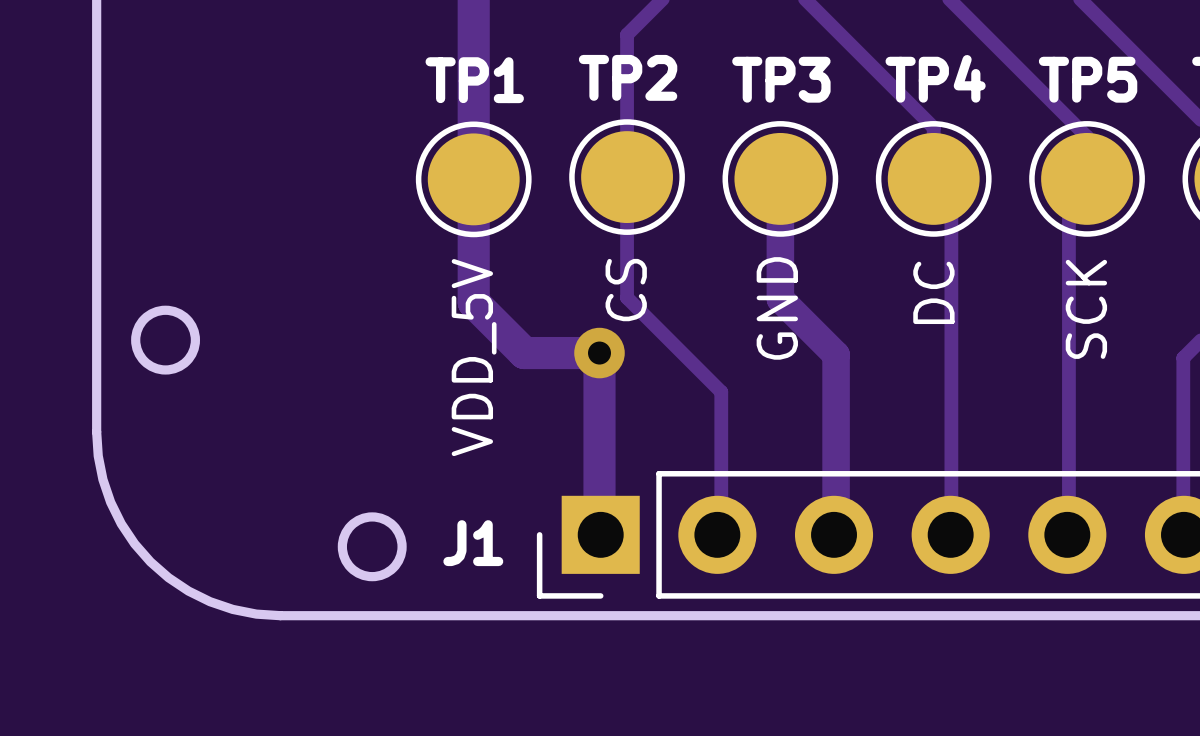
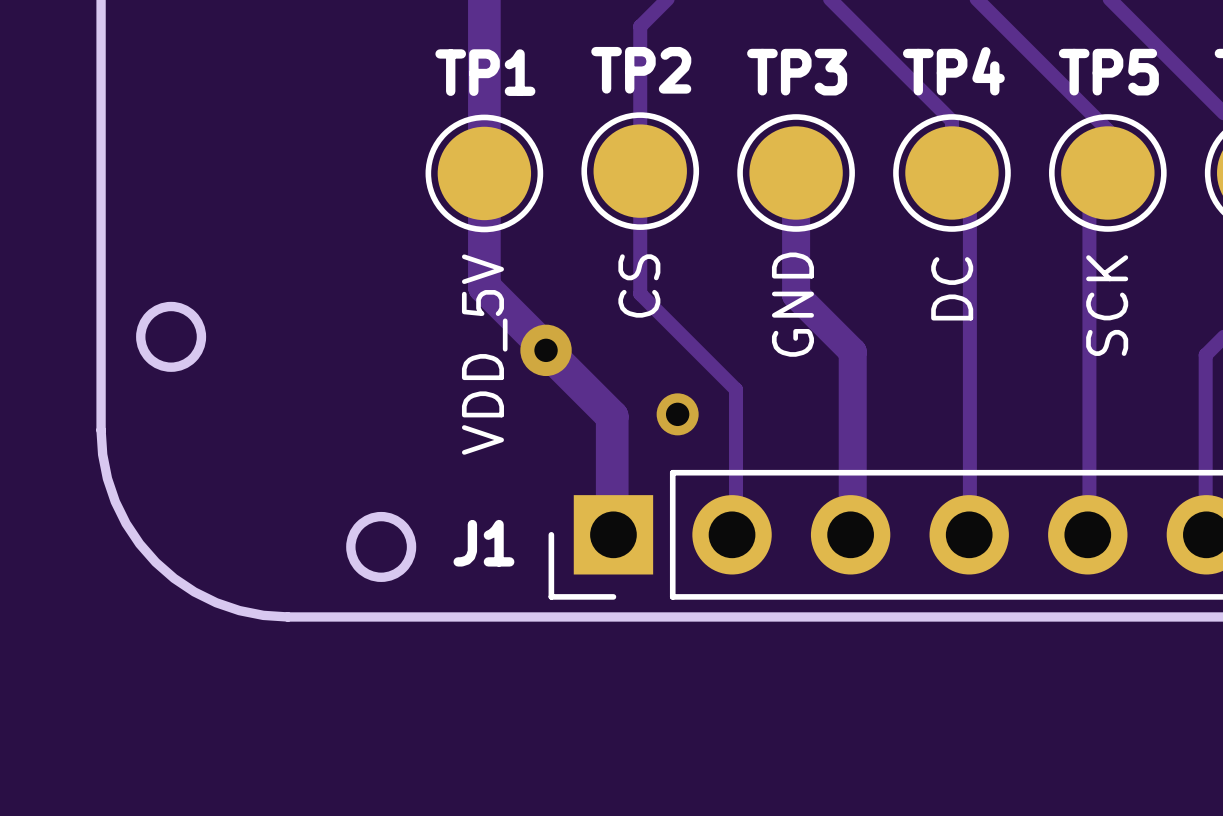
track: (473, 290) (473, 302) (524, 353) (599, 353) (599, 418) -> (484, 286) (612, 416)
via position: (599, 353) -> (546, 350)
via: none -> (677, 414)

